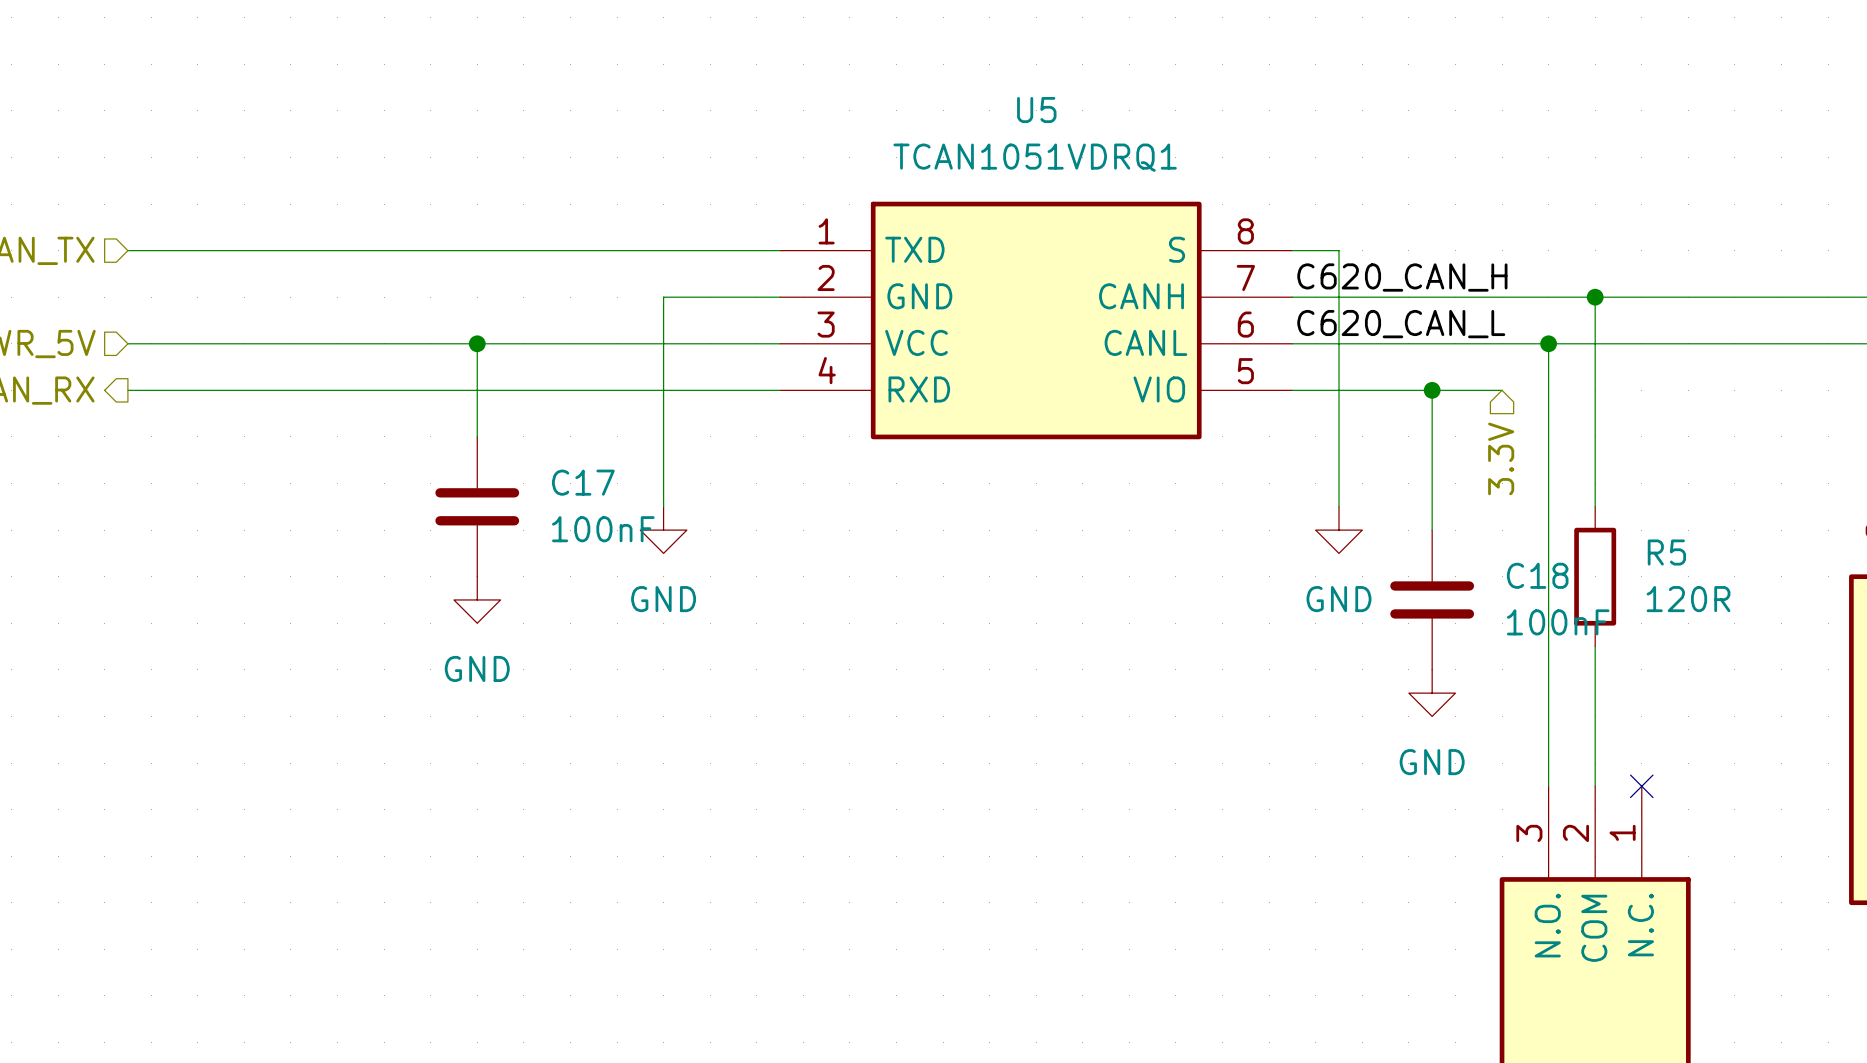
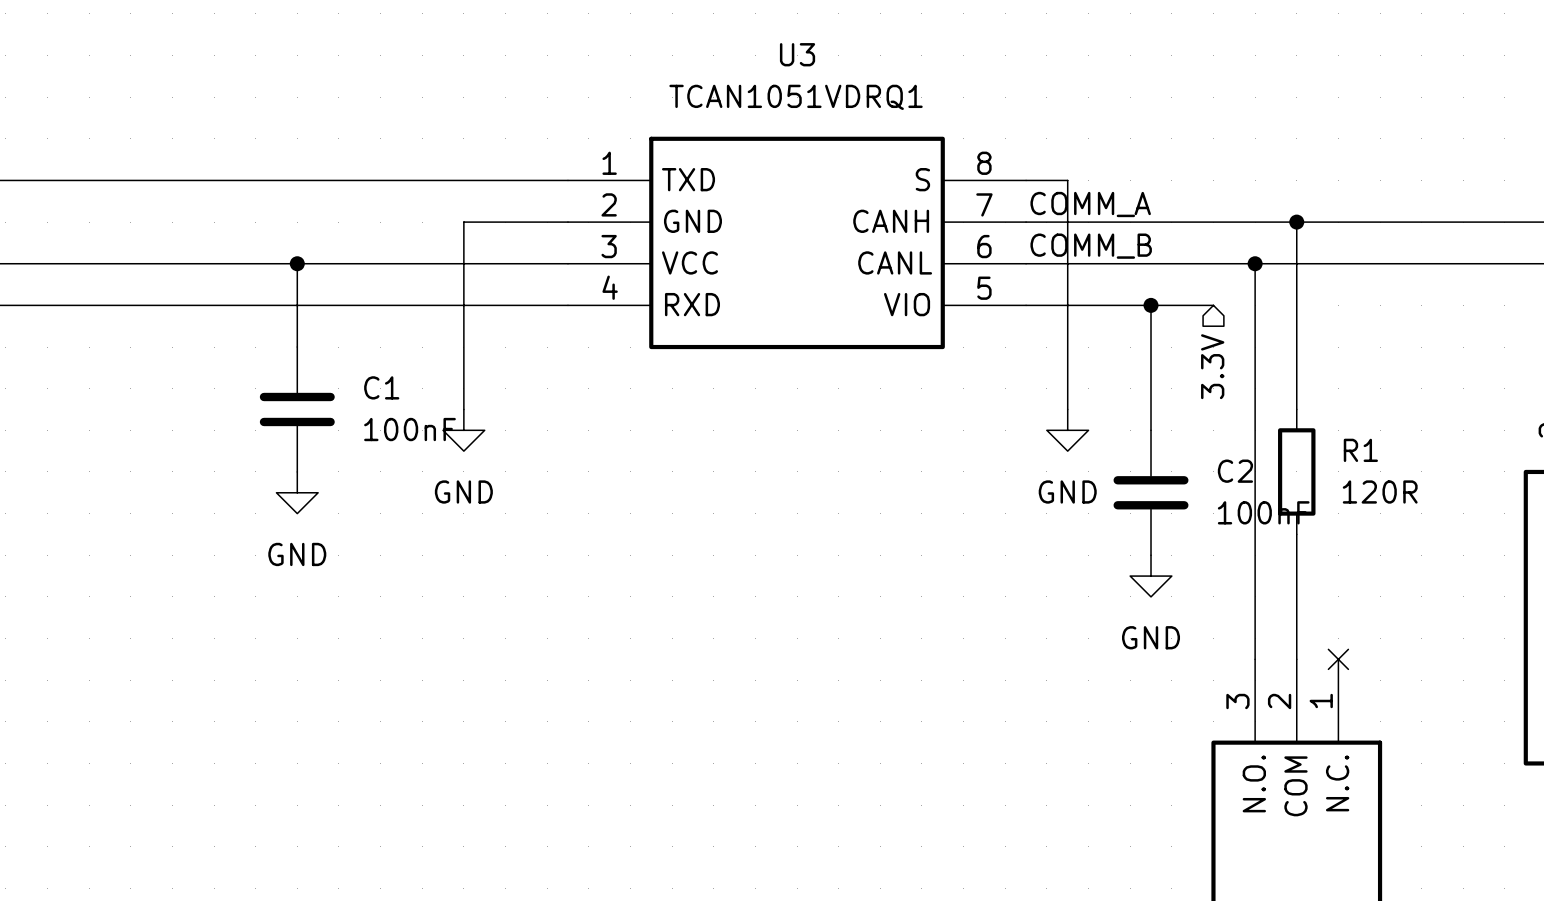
U5 name: U5 (1036, 110) -> U3 (797, 54)
label: C620_CAN_H (1402, 277) -> COMM_A (1090, 204)
label: C620_CAN_L (1401, 324) -> COMM_B (1091, 246)
C17 name: C17 (583, 482) -> C1 (381, 387)
R5 name: R5 (1666, 552) -> R1 (1360, 450)
C18 name: C18 (1537, 575) -> C2 (1235, 471)

